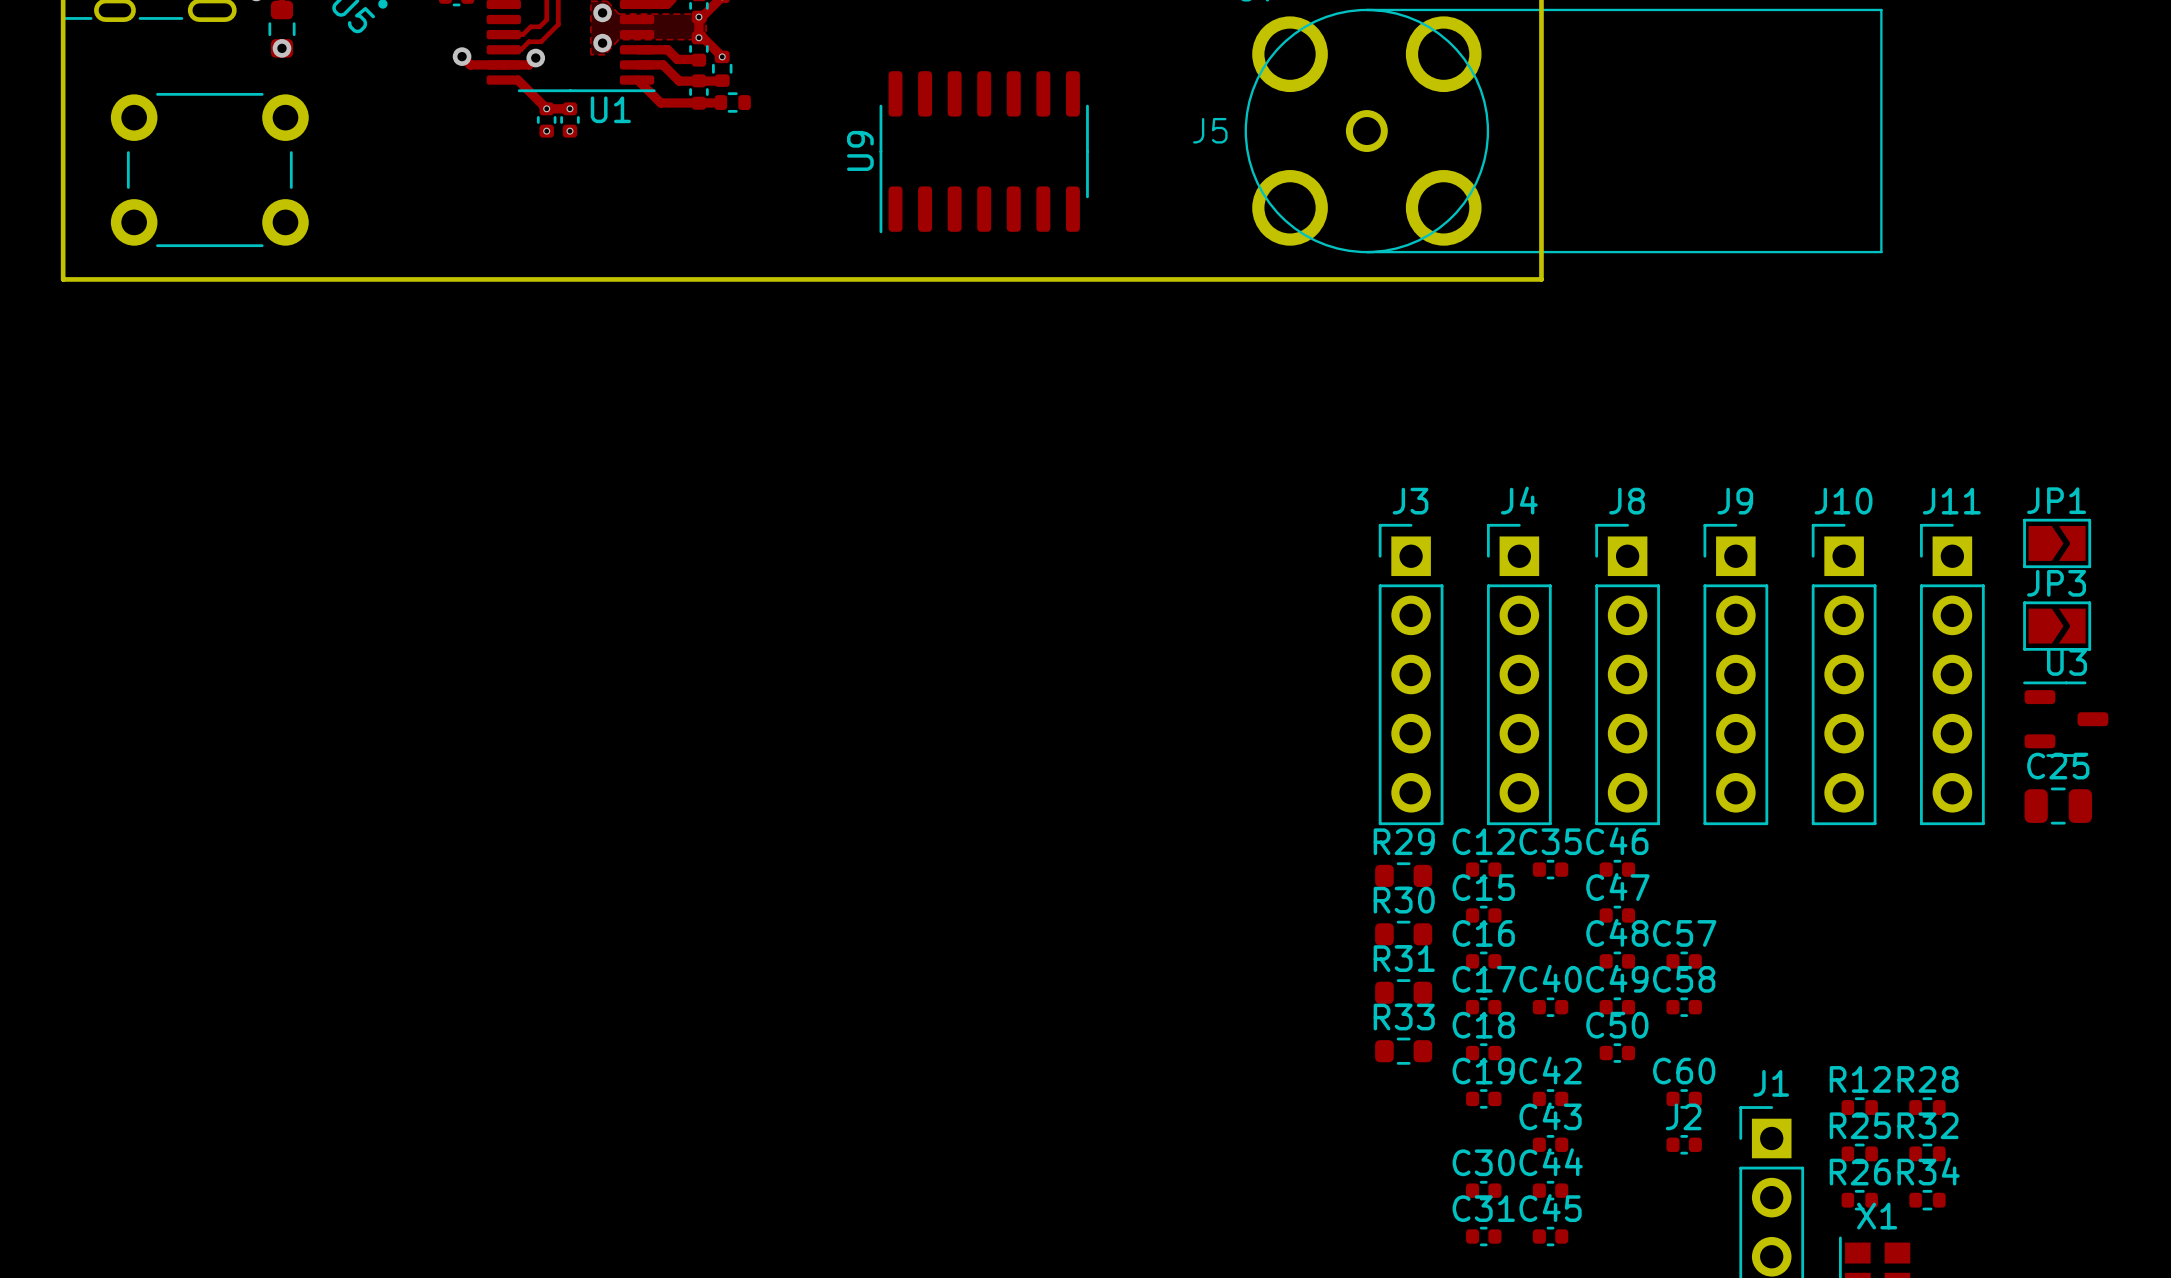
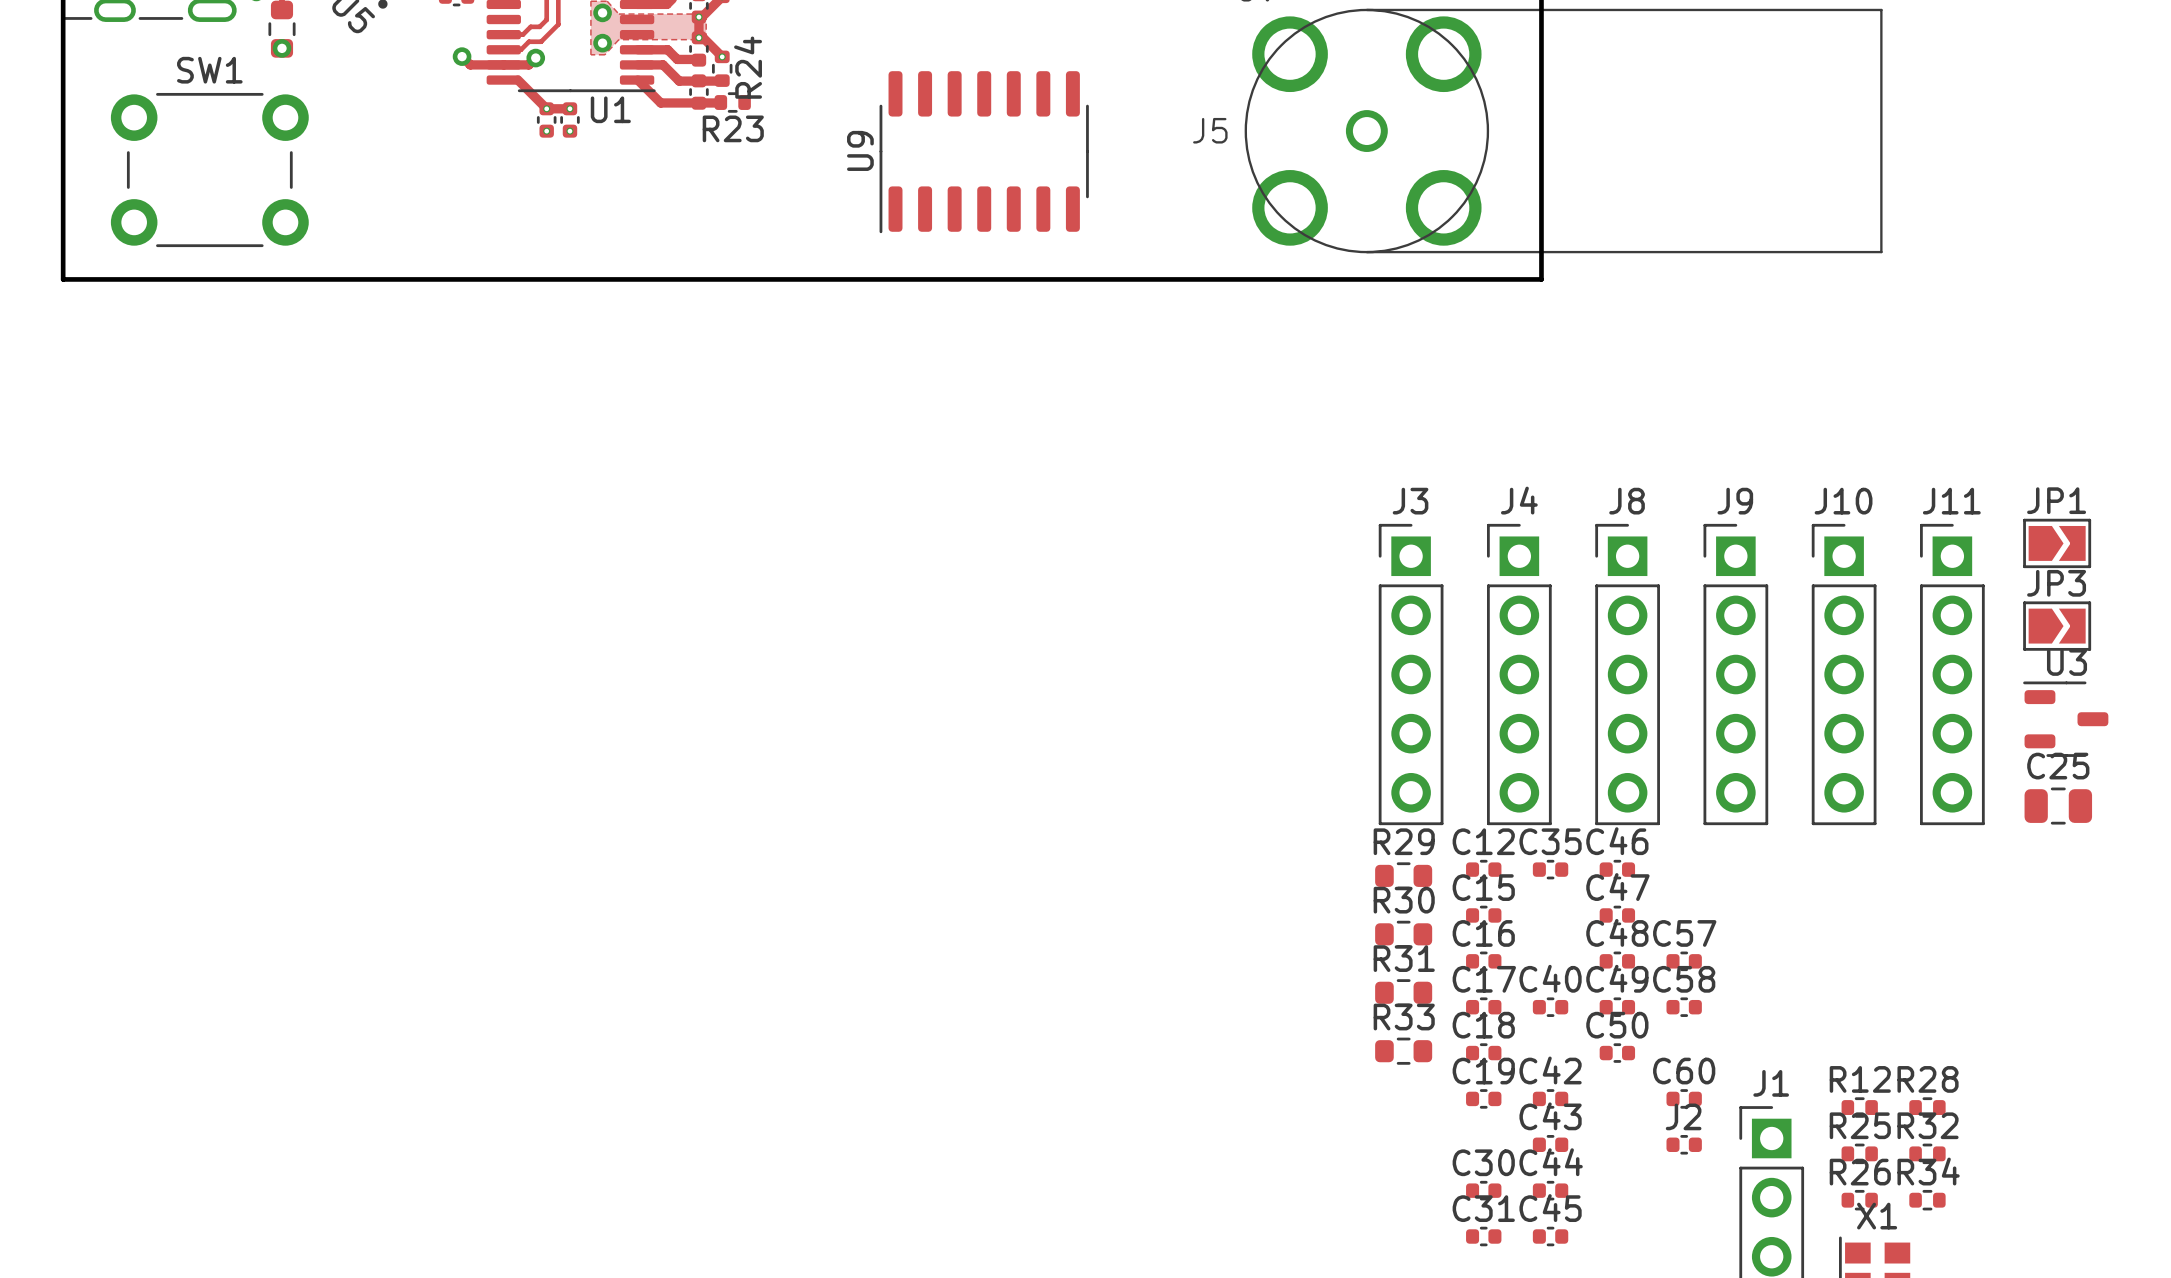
R24 name: none -> R24 (748, 67)
SW1 name: none -> SW1 (209, 70)
R23 name: none -> R23 (733, 128)

